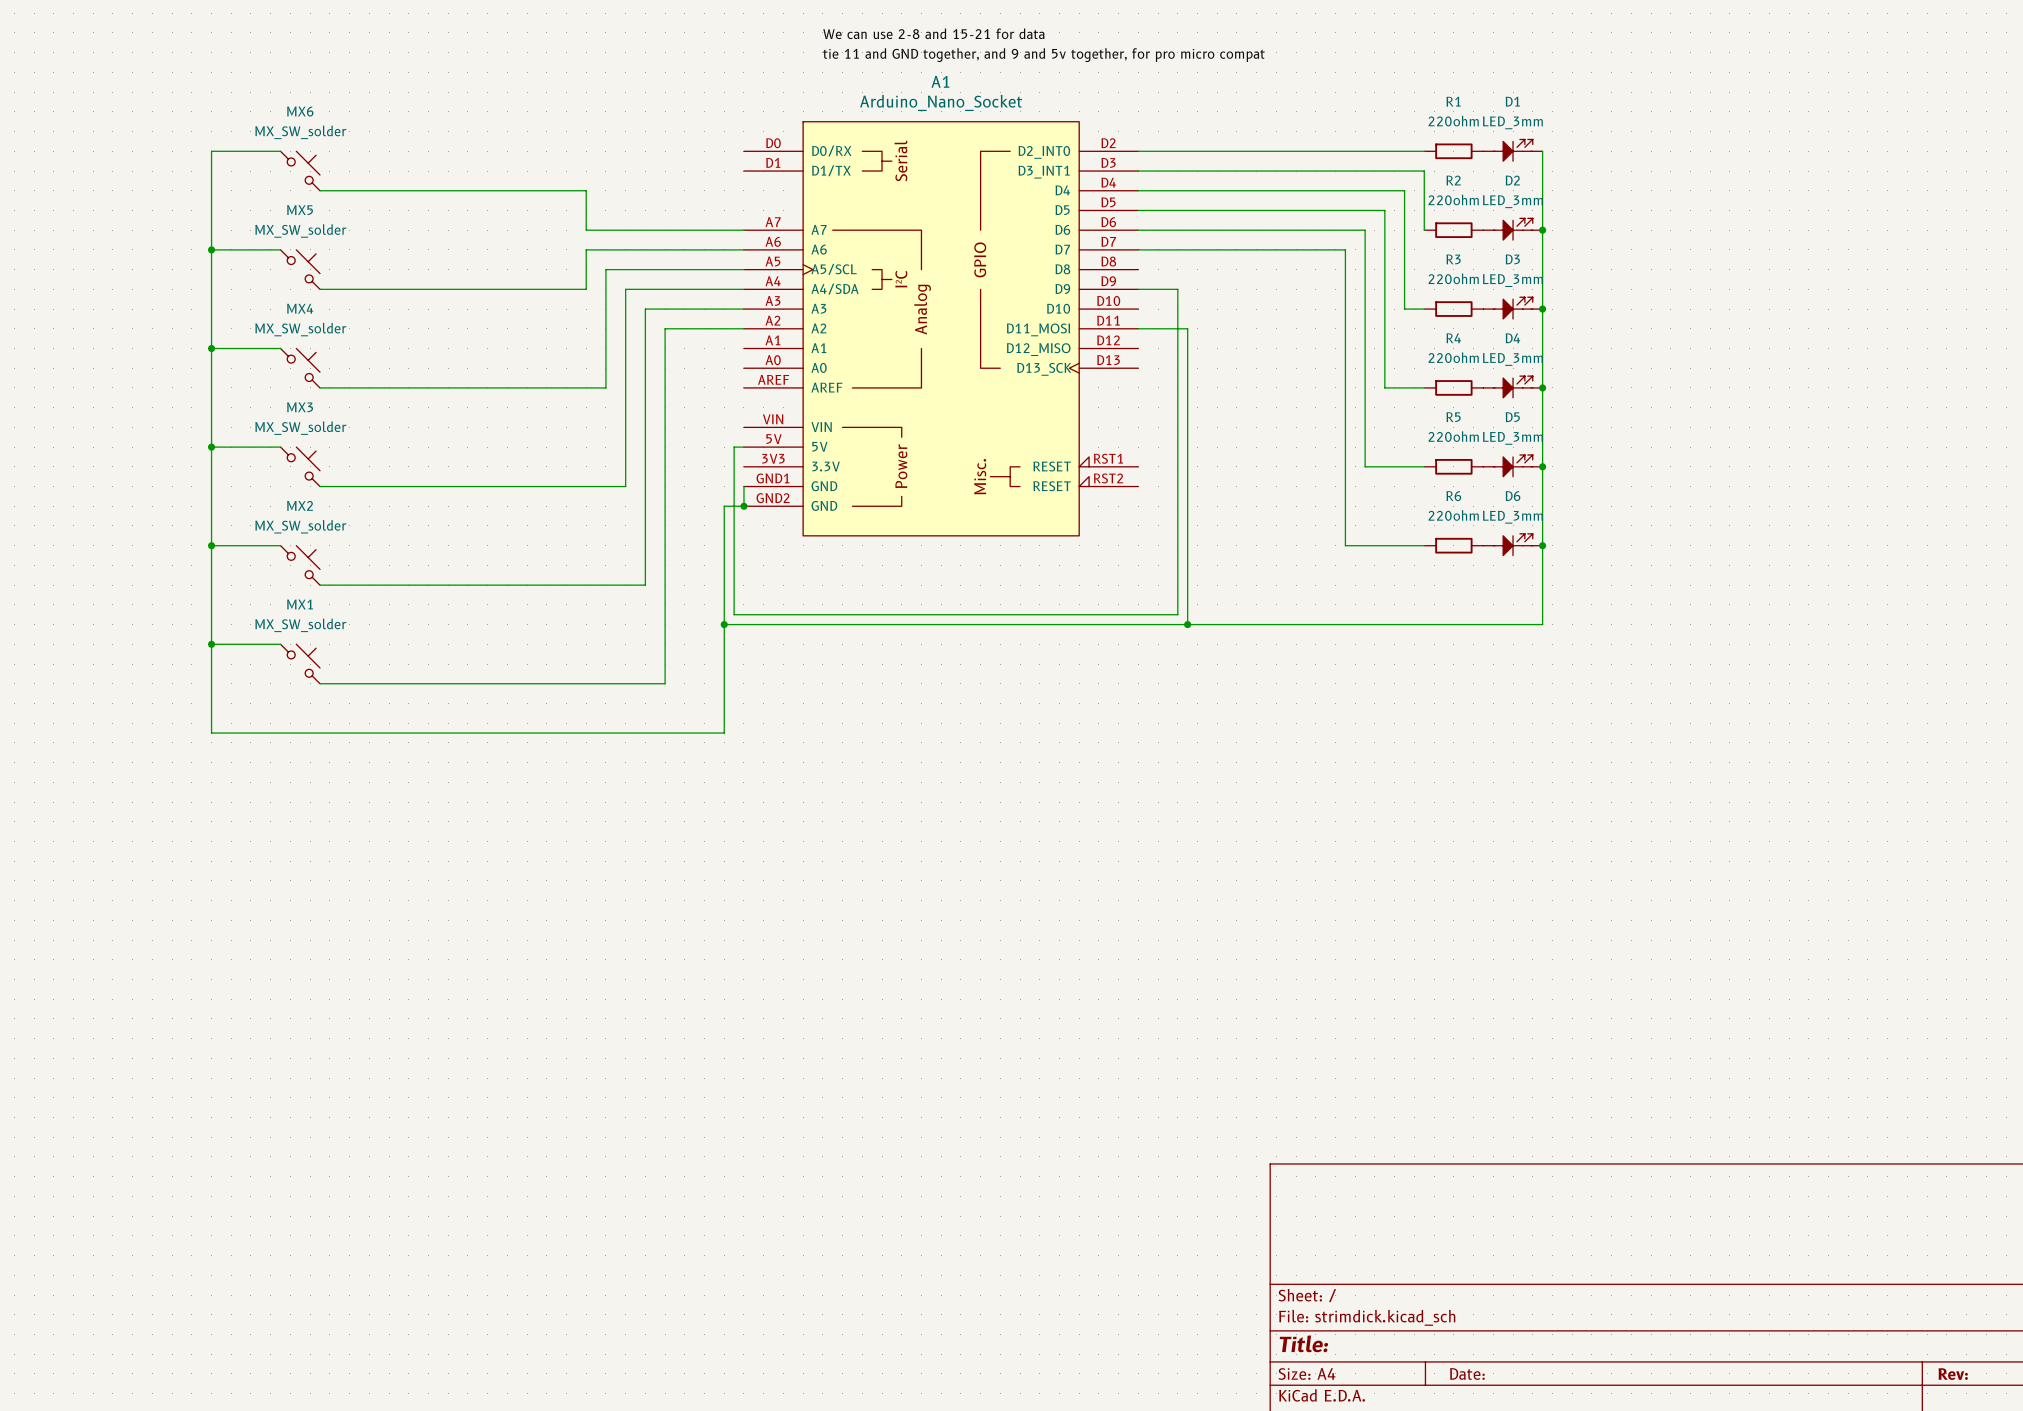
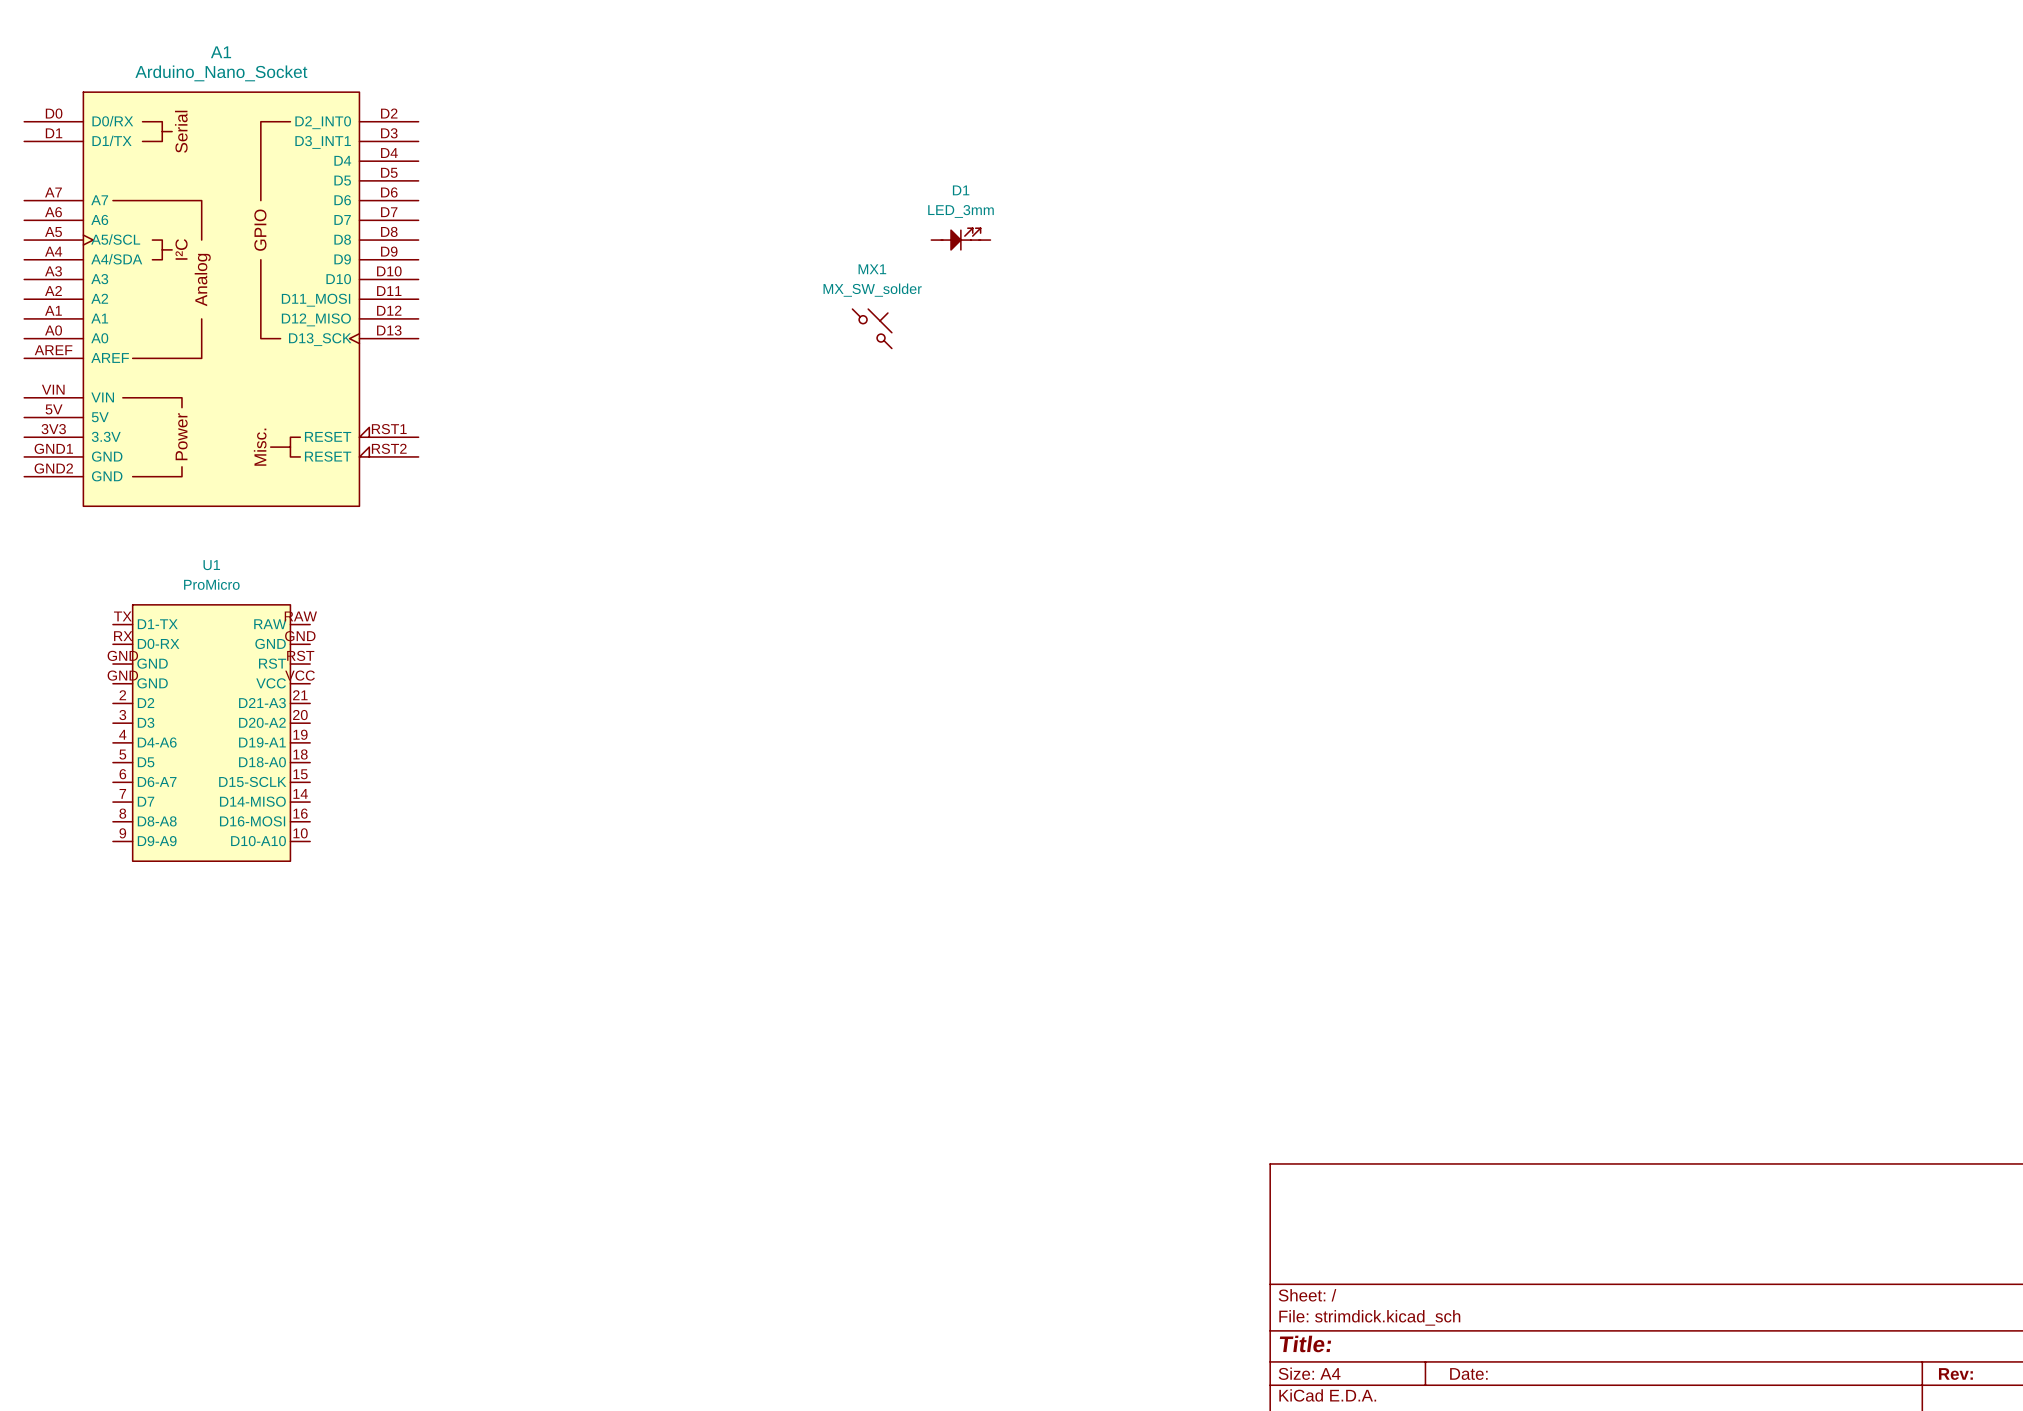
label: We can use 2-8 and 15-21 for data (933, 33) -> none
label: tie 11 and GND together, and 9 and 5v together, for pro micro compat (1043, 55) -> none
D1 position: (1513, 150) -> (960, 239)
wire: (280, 151) (211, 151) (211, 733) (724, 733) (724, 506) (743, 506) (743, 486) -> none
wire: (1138, 151) (1424, 151) -> none
R1: 220ohm (1453, 151) -> none
wire: (1542, 151) (1542, 624) (724, 624) -> none
MX6: MX_SW_solder (300, 171) -> none
wire: (1138, 171) (1424, 171) (1424, 230) -> none
wire: (320, 190) (586, 190) (586, 230) (743, 230) -> none
wire: (1138, 190) (1404, 190) (1404, 309) (1424, 309) -> none
wire: (1138, 210) (1384, 210) (1384, 387) (1424, 387) -> none
D2: LED_3mm (1513, 229) -> none
wire: (1138, 230) (1365, 230) (1365, 466) (1424, 466) -> none
R2: 220ohm (1453, 230) -> none
junction: (1542, 230) -> none
junction: (211, 249) -> none
wire: (743, 249) (586, 249) (586, 289) (320, 289) -> none
wire: (1138, 249) (1345, 249) (1345, 545) (1424, 545) -> none
MX5: MX_SW_solder (300, 269) -> none
wire: (743, 269) (605, 269) (605, 387) (320, 387) -> none
wire: (743, 289) (625, 289) (625, 486) (320, 486) -> none
wire: (1138, 289) (1177, 289) (1177, 614) (734, 614) (734, 447) (743, 447) -> none
D3: LED_3mm (1513, 308) -> none
wire: (743, 309) (645, 309) (645, 585) (320, 585) -> none
R3: 220ohm (1453, 309) -> none
junction: (1542, 309) -> none
wire: (743, 328) (665, 328) (665, 683) (320, 683) -> none
A1 position: (941, 328) -> (221, 299)
wire: (1138, 328) (1187, 328) (1187, 624) -> none
junction: (211, 348) -> none
MX4: MX_SW_solder (300, 368) -> none
D4: LED_3mm (1513, 386) -> none
R4: 220ohm (1453, 387) -> none
junction: (1542, 387) -> none
junction: (211, 447) -> none
D5: LED_3mm (1513, 465) -> none
MX3: MX_SW_solder (300, 466) -> none
R5: 220ohm (1453, 466) -> none
junction: (1542, 466) -> none
junction: (743, 506) -> none
D6: LED_3mm (1513, 544) -> none
wire: (211, 545) (280, 545) -> none
junction: (211, 545) -> none
R6: 220ohm (1453, 545) -> none
junction: (1542, 545) -> none
MX2: MX_SW_solder (300, 565) -> none
junction: (724, 624) -> none
junction: (1187, 624) -> none
junction: (211, 644) -> none
MX1 position: (300, 664) -> (872, 328)
U1: none -> ProMicro (211, 733)

